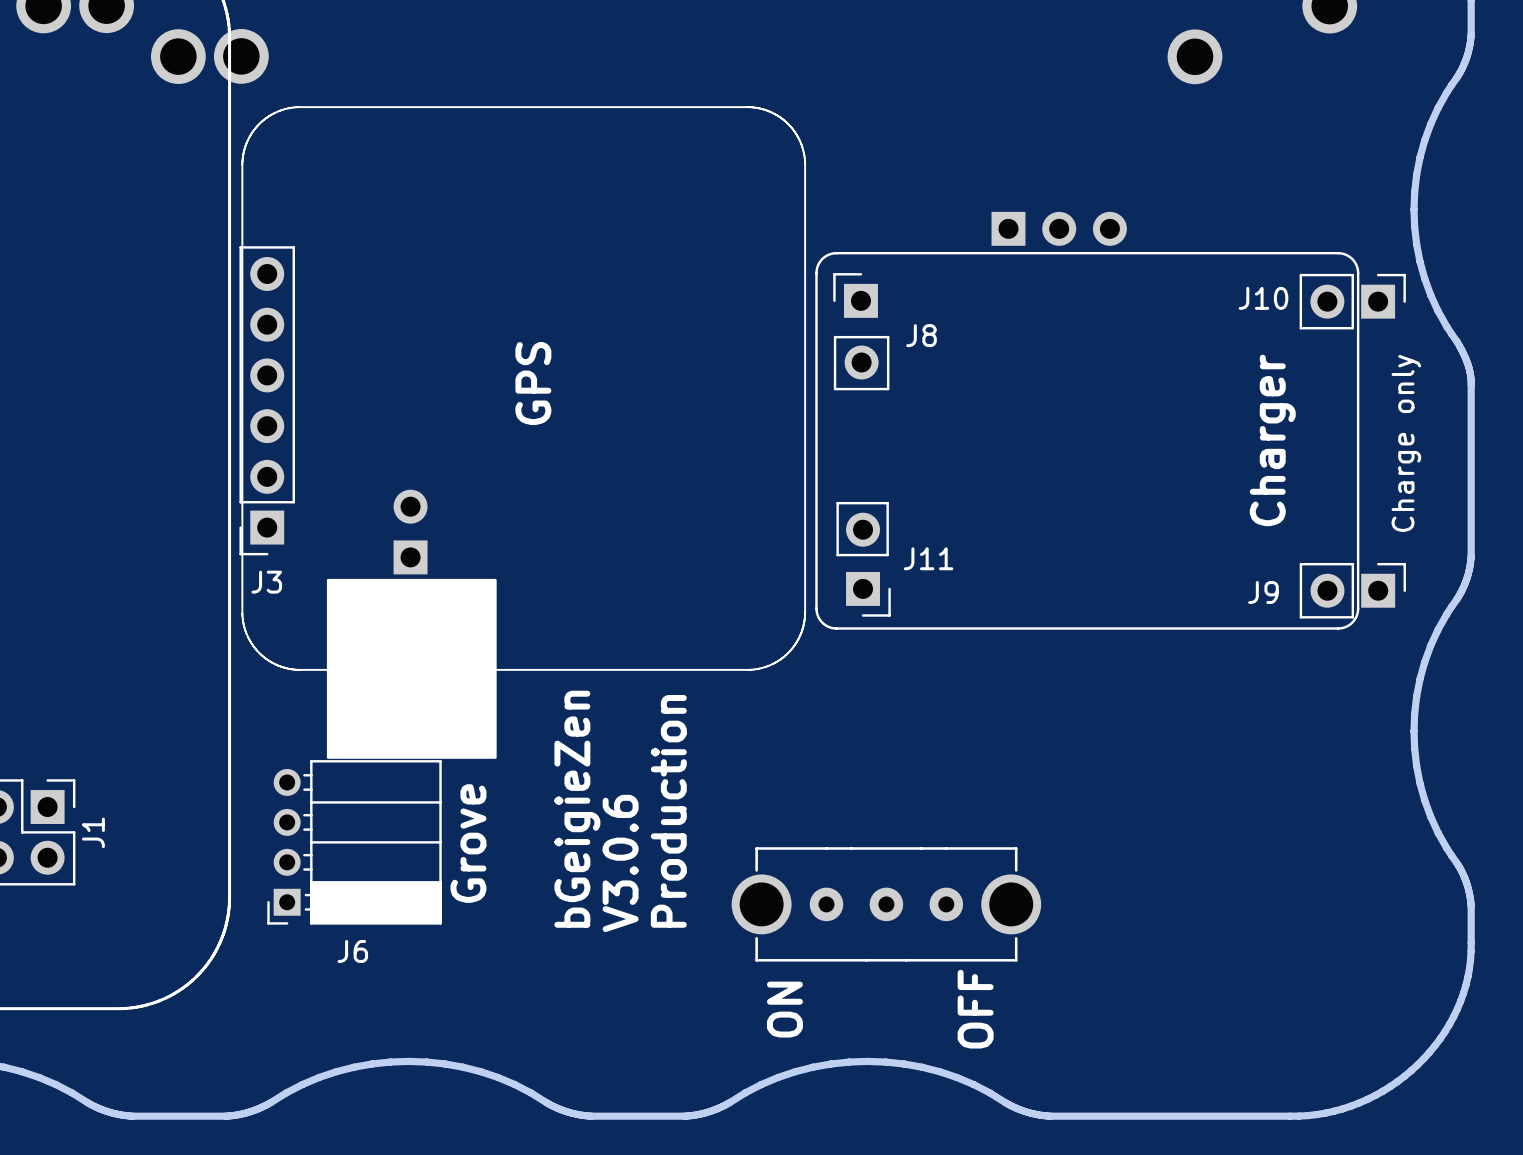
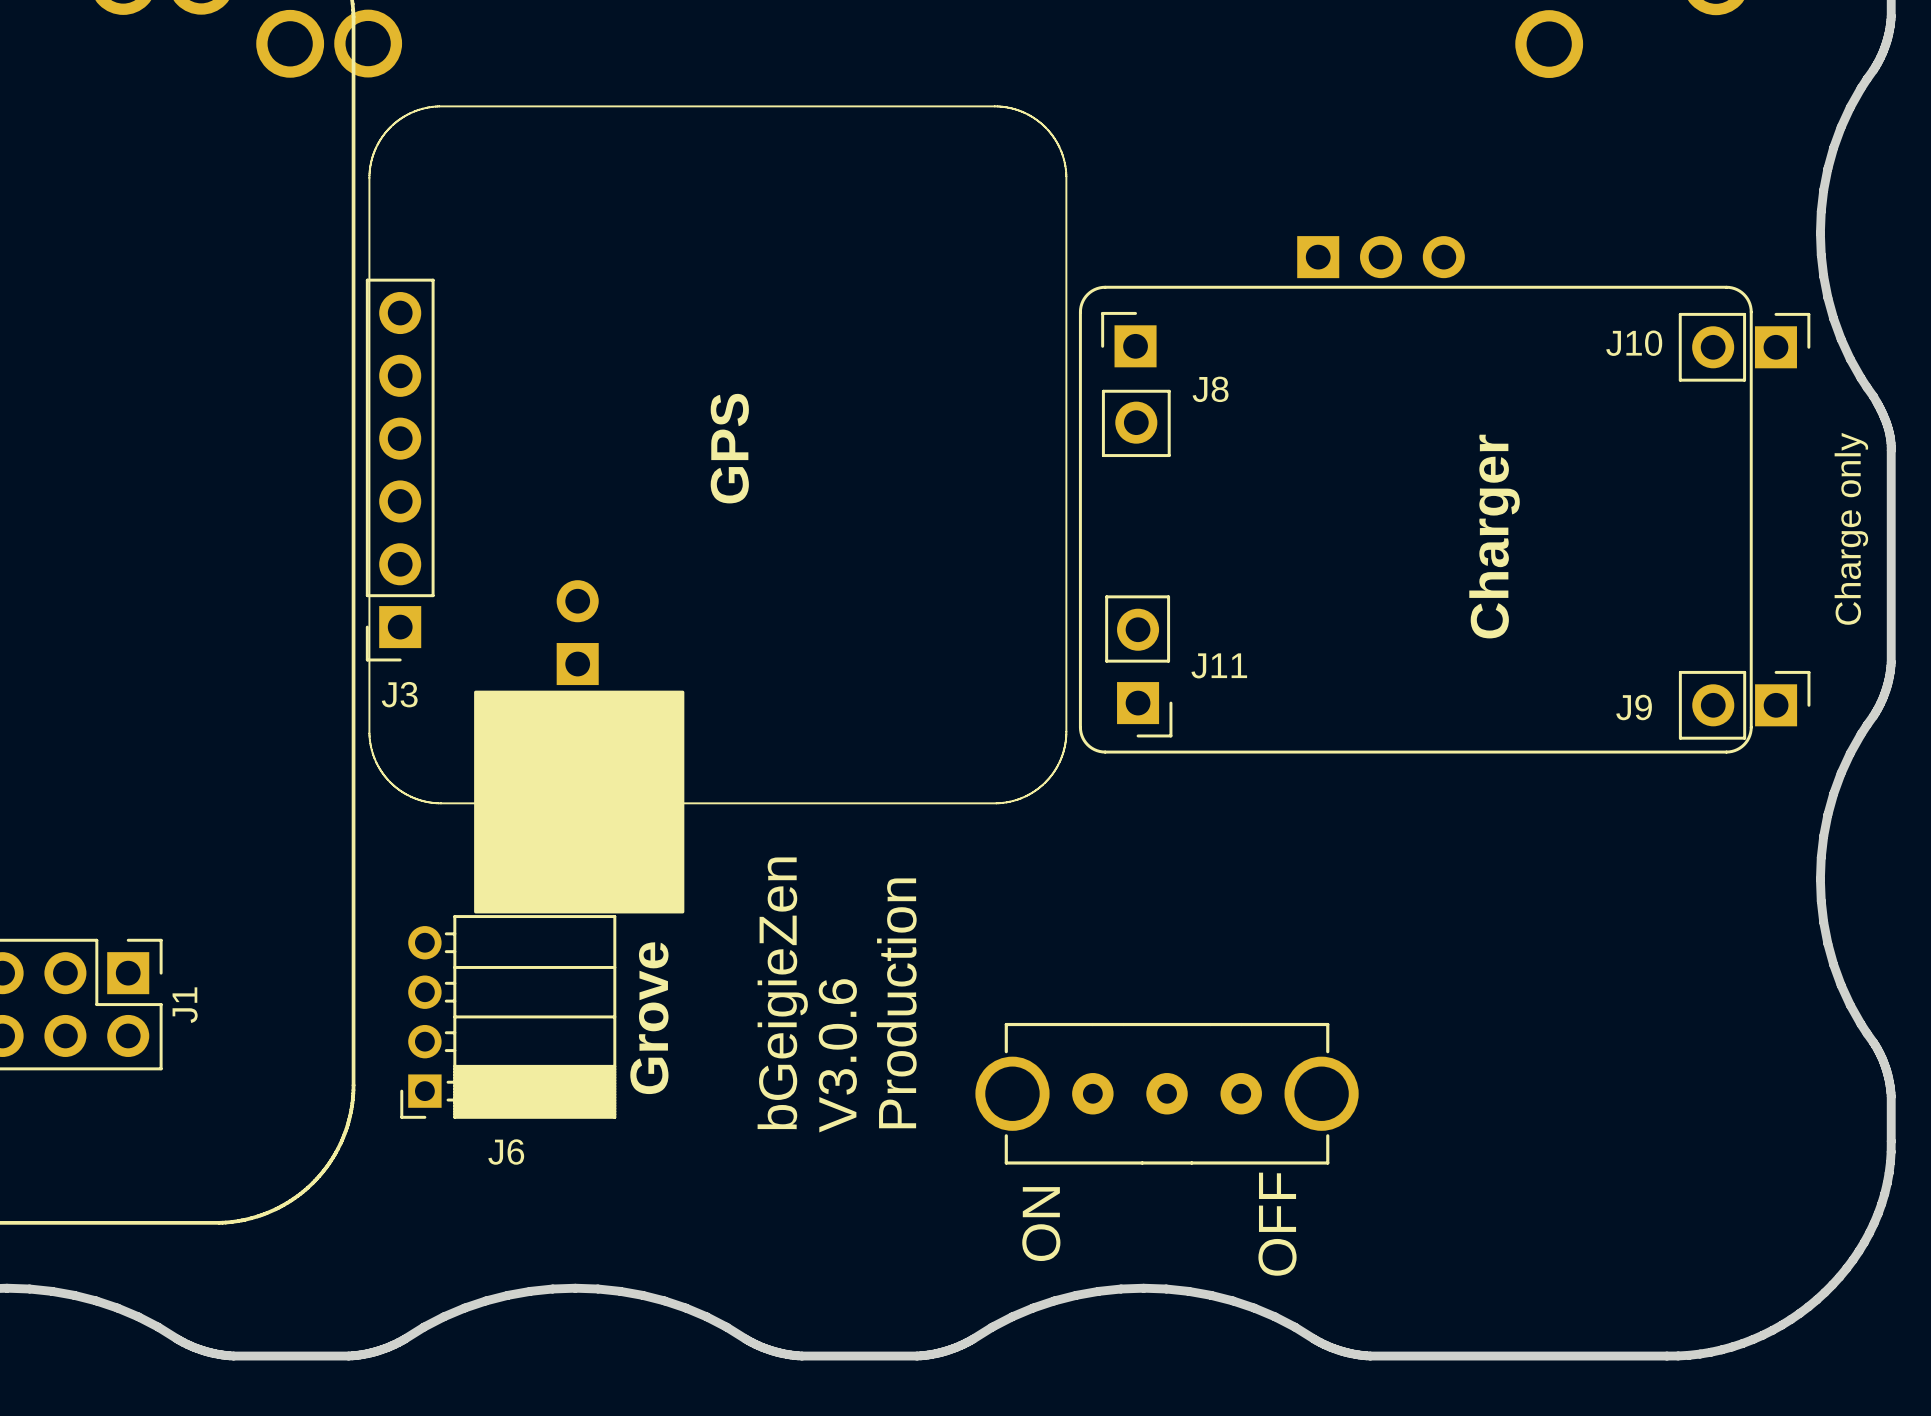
text position: Charger (1272, 440) -> Charger (1494, 536)
text position: Charge only (1406, 443) -> Charge only (1851, 528)

